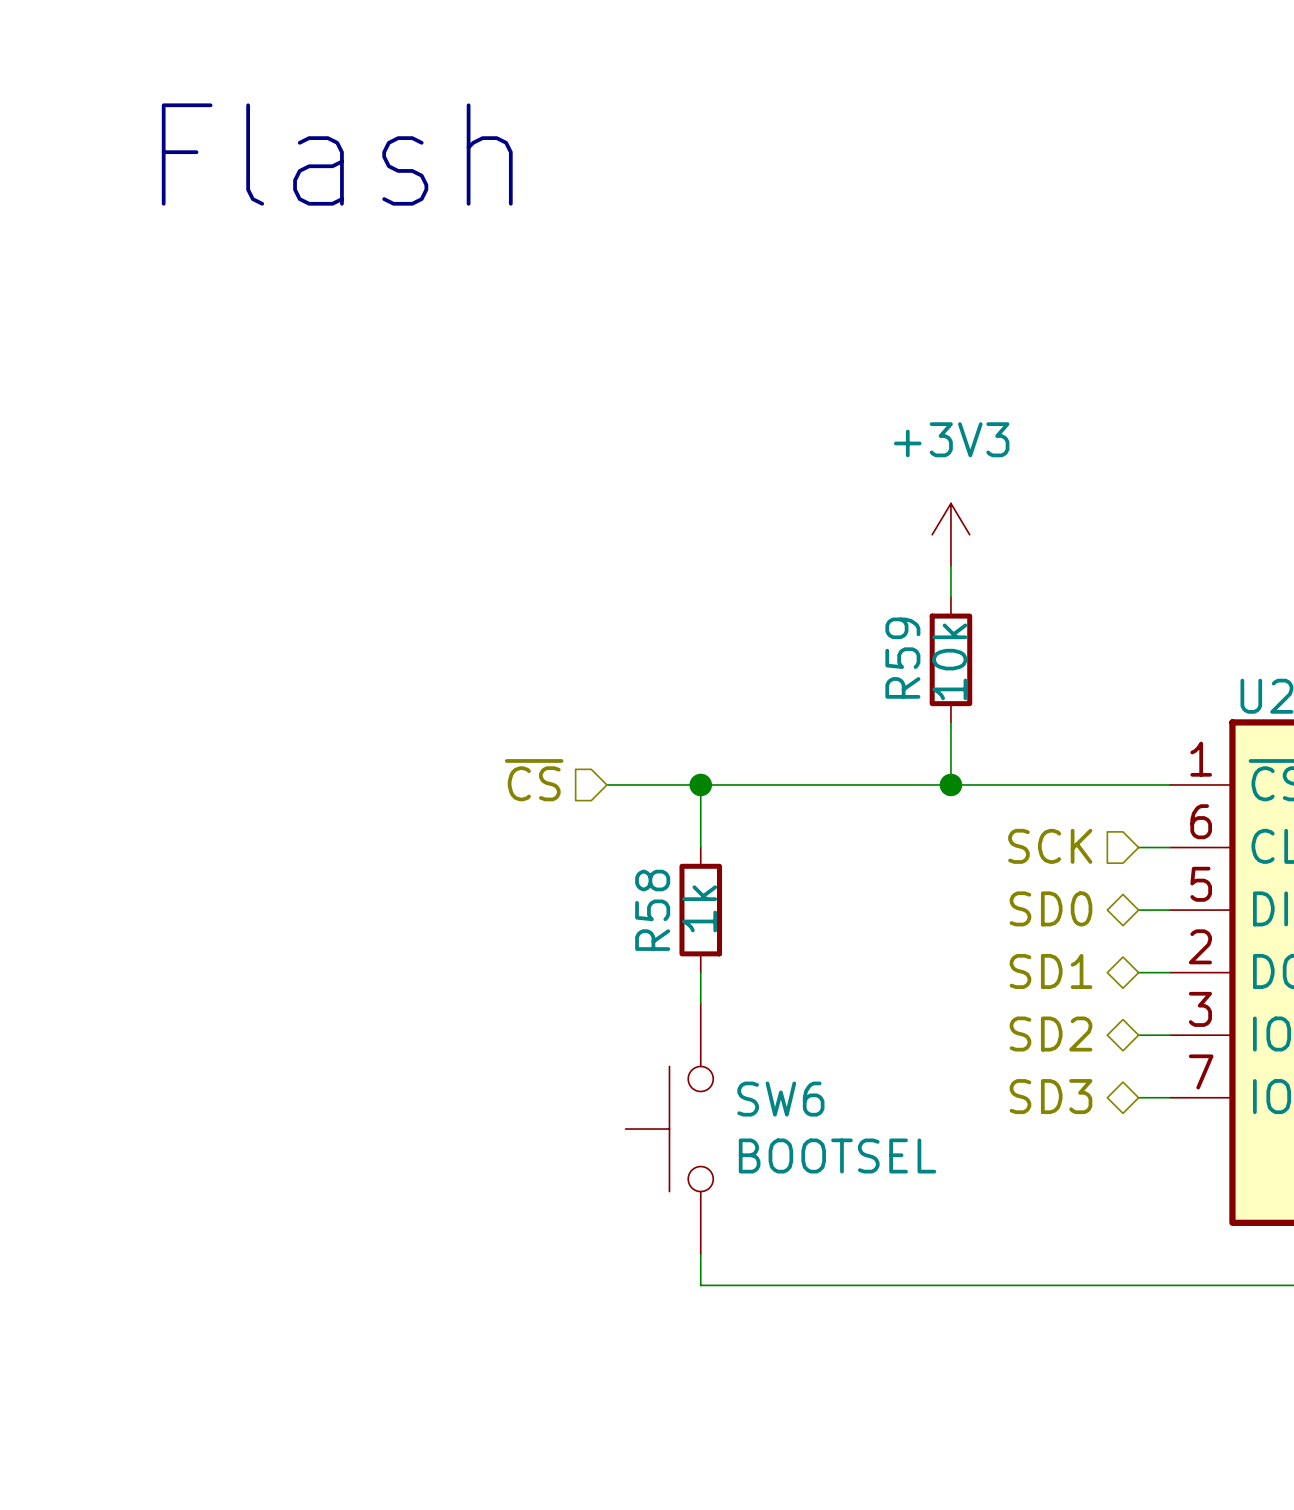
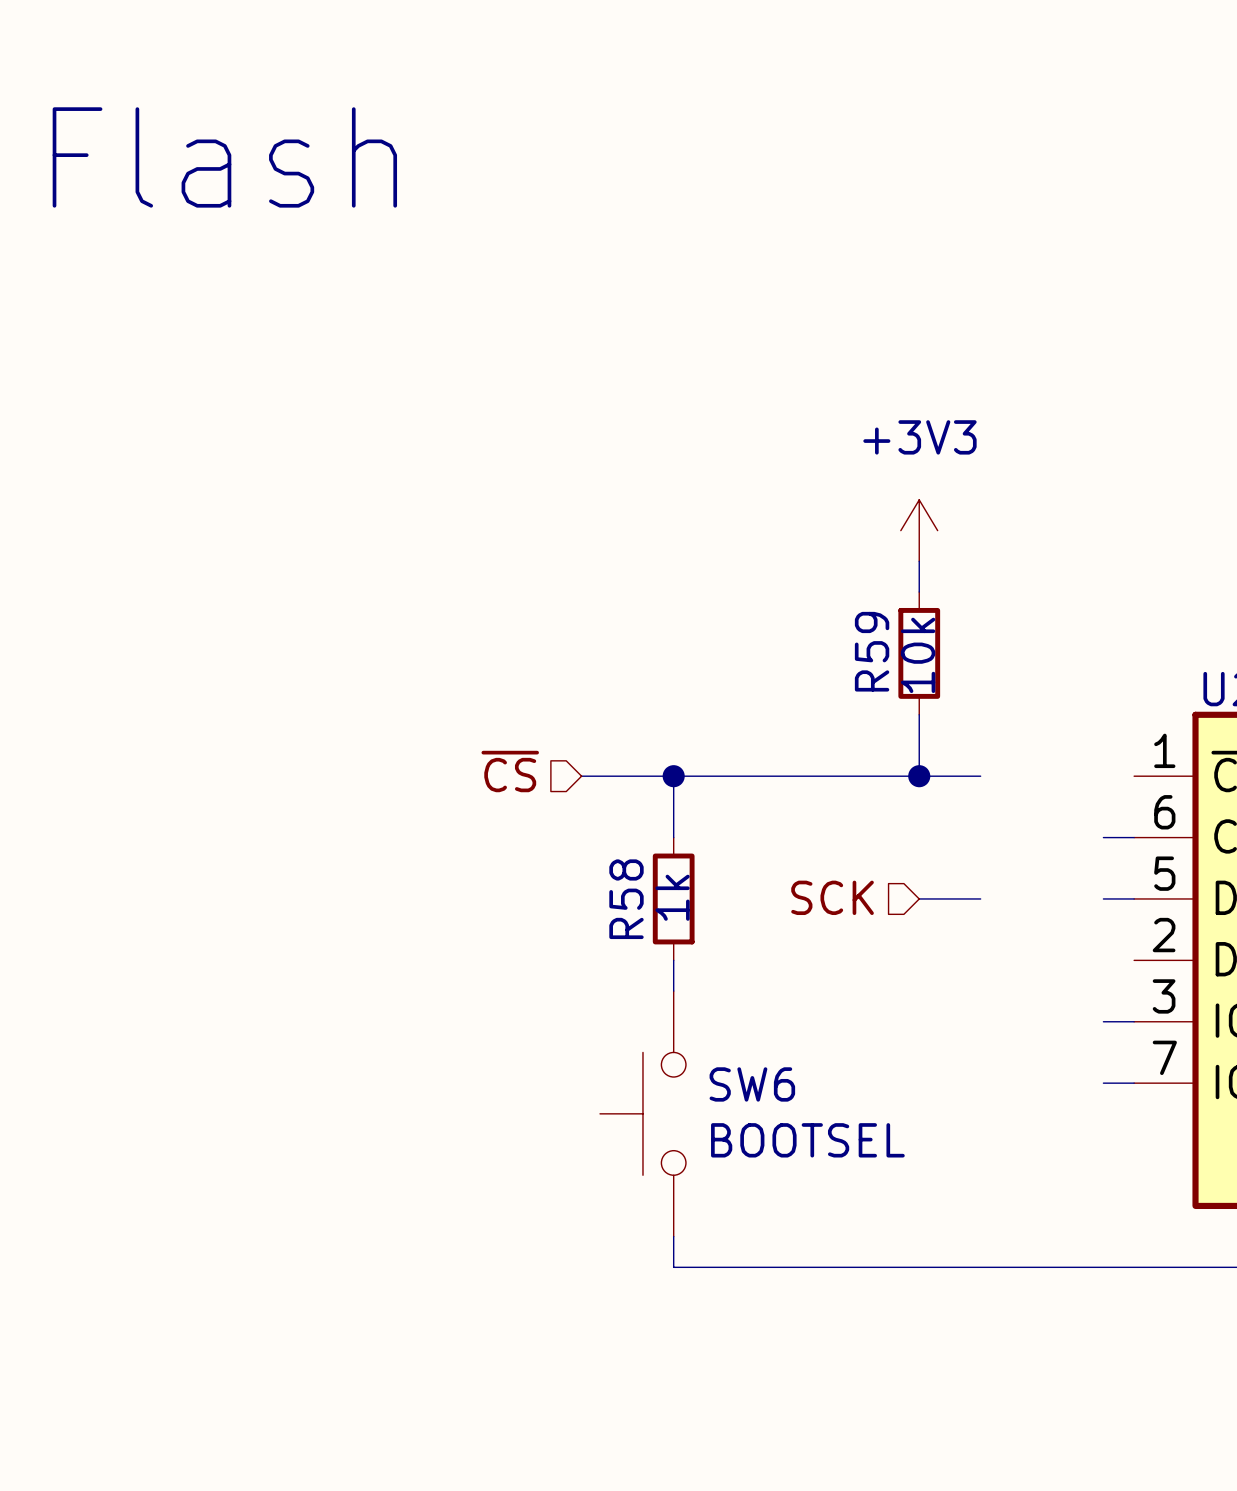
text position: Flash (337, 154) -> Flash (224, 157)
wire: (1013, 784) (1169, 784) -> none
hierarchical label position: SCK (1050, 846) -> SCK (832, 897)
hierarchical label: SD0 (1051, 908) -> none
wire: none -> (919, 898) (980, 898)
hierarchical label: SD1 (1051, 971) -> none
wire: (1138, 972) (1169, 972) -> none
hierarchical label: SD2 (1051, 1034) -> none
hierarchical label: SD3 (1051, 1096) -> none

